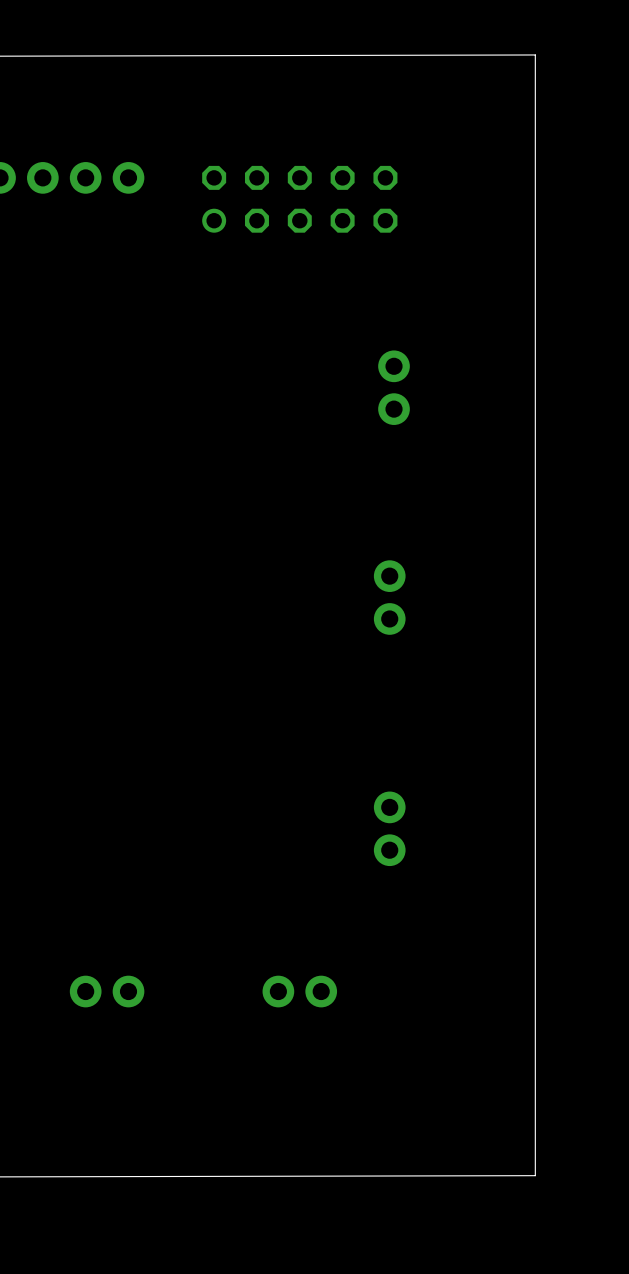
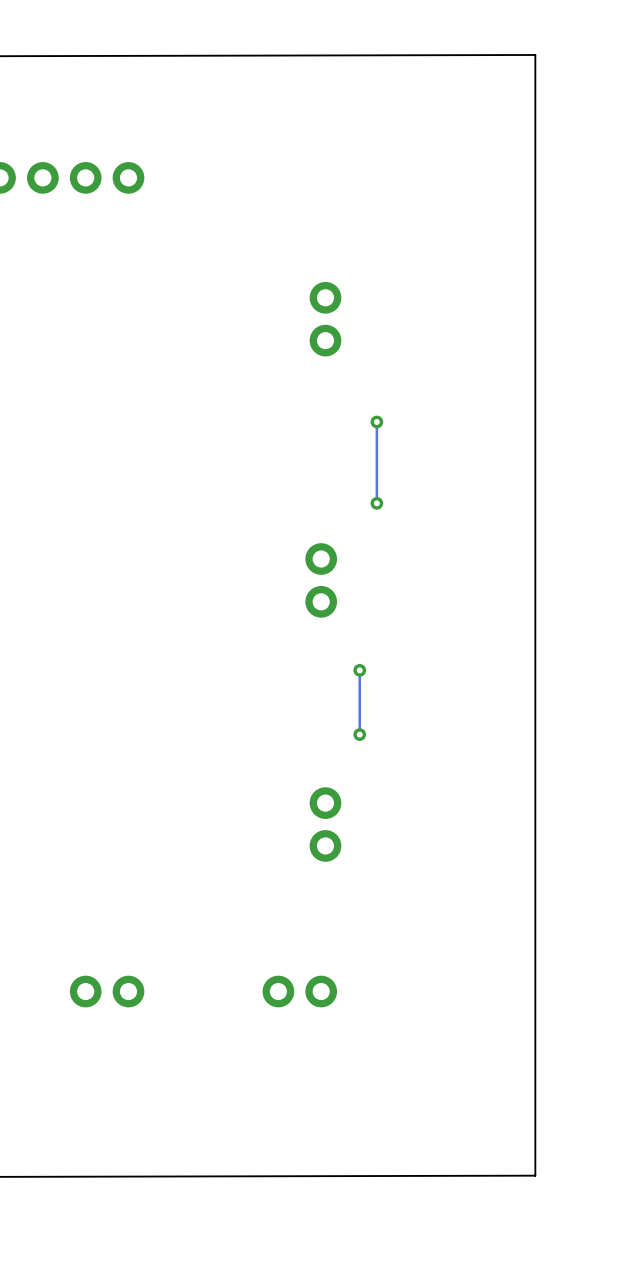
part: (299, 199) -> none
part position: (394, 387) -> (325, 319)
track: none -> (376, 421) (376, 503)
via: none -> (376, 421)
via: none -> (376, 503)
part position: (389, 597) -> (321, 580)
track: none -> (359, 670) (359, 734)
via: none -> (359, 670)
via: none -> (359, 734)
part position: (389, 828) -> (325, 824)

